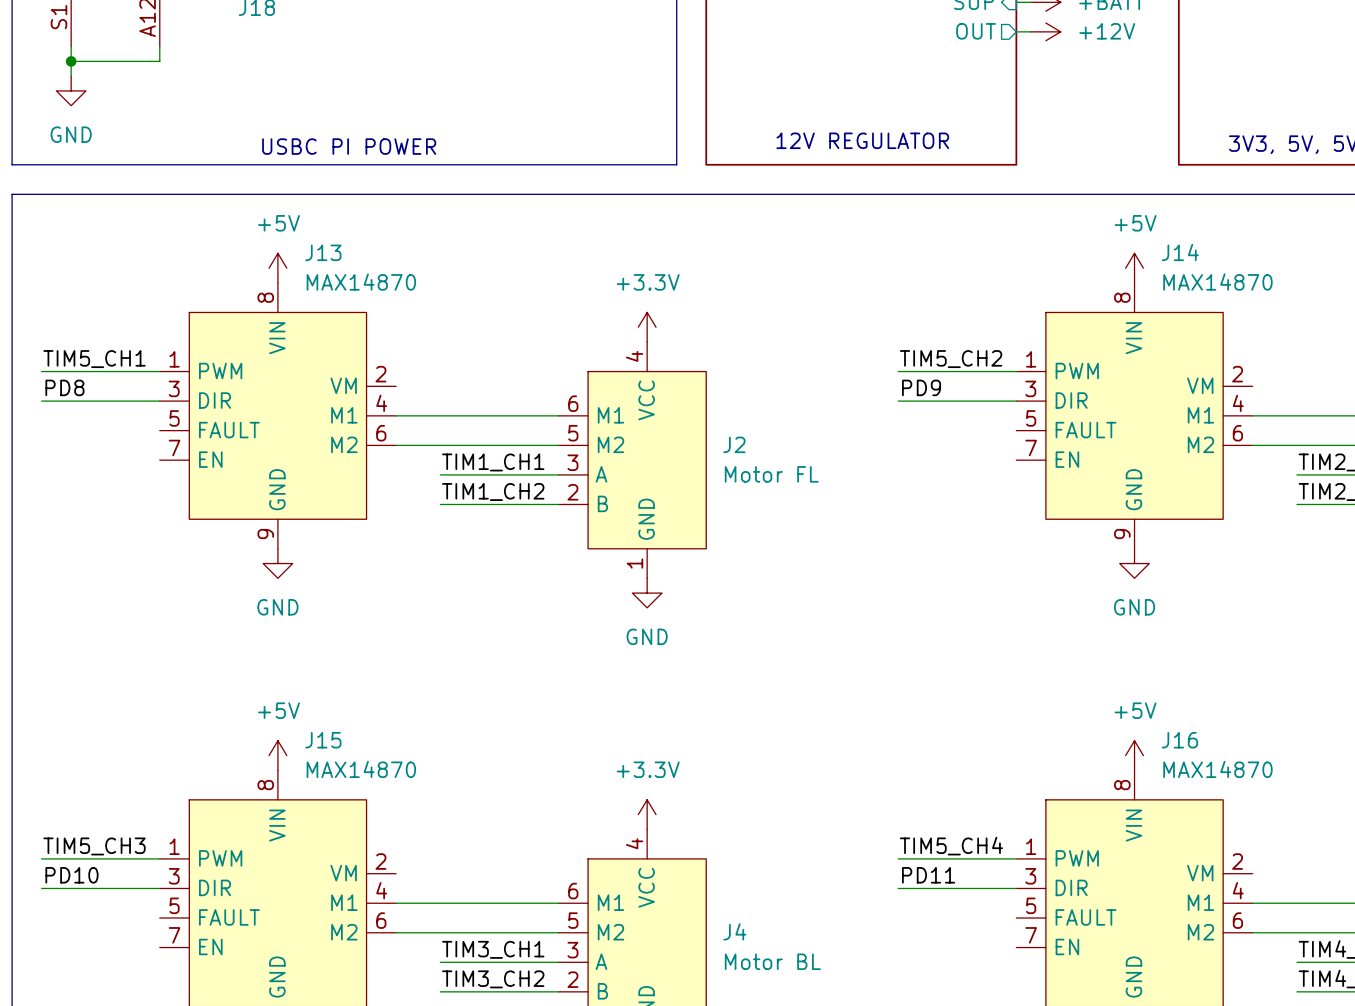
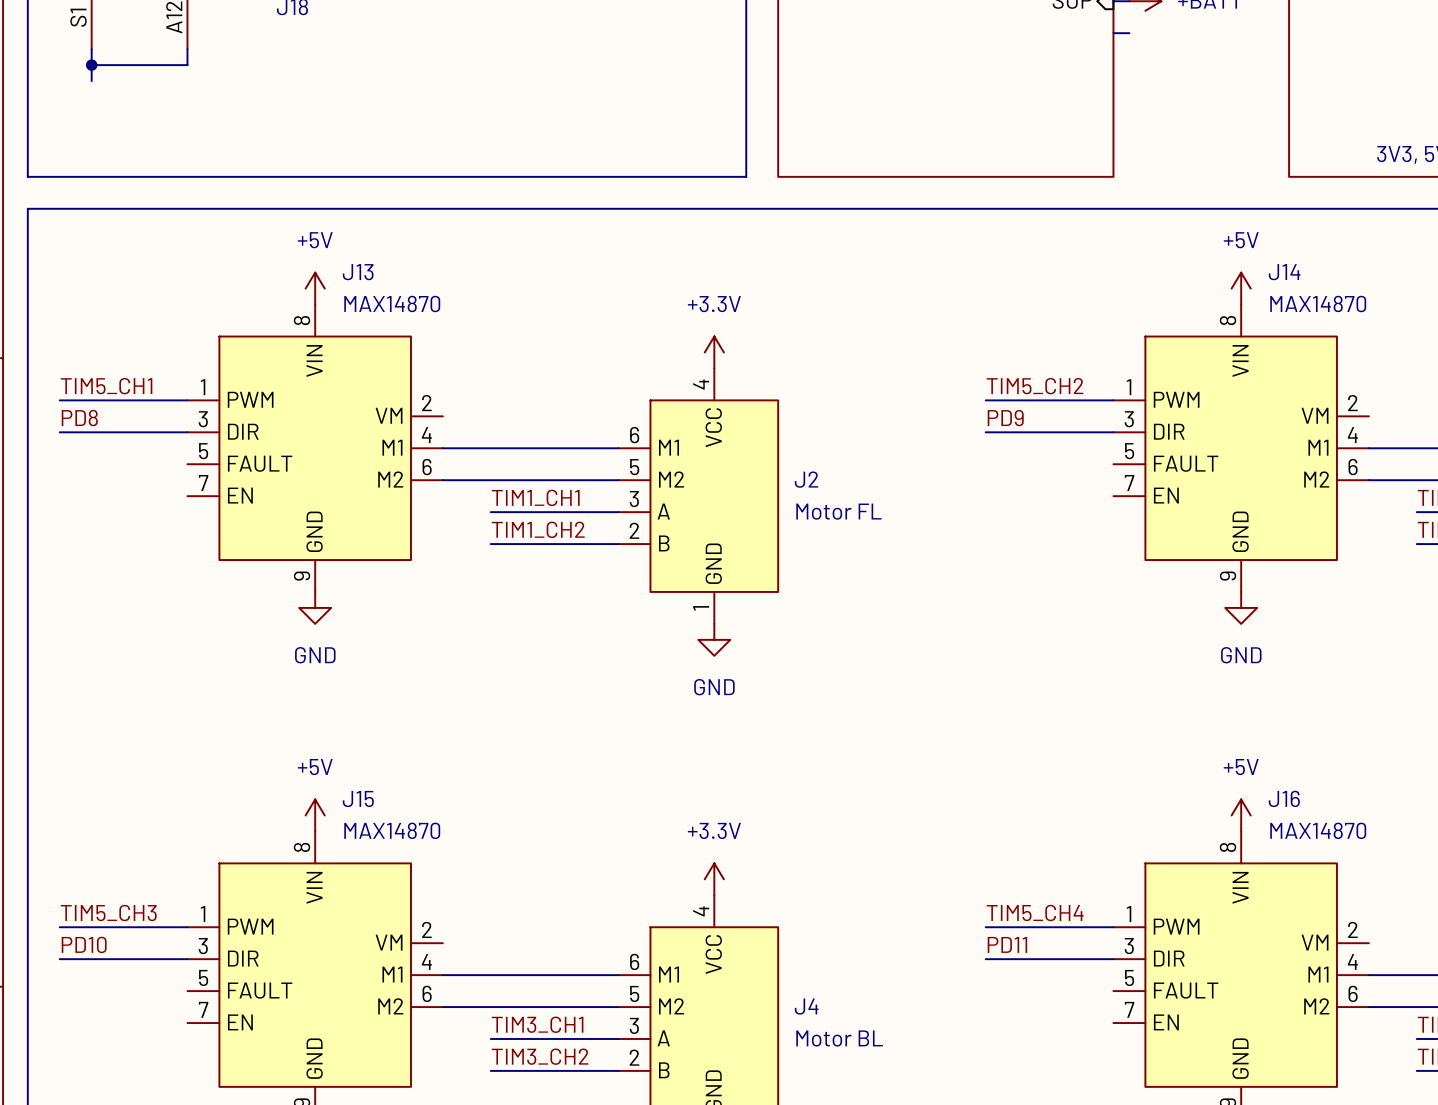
sheet pin: OUT (976, 31) -> none
power symbol: +12V (1045, 31) -> none
power symbol: GND (71, 90) -> none
text: 12V REGULATOR (862, 140) -> none
text: USBC PI POWER (349, 146) -> none

